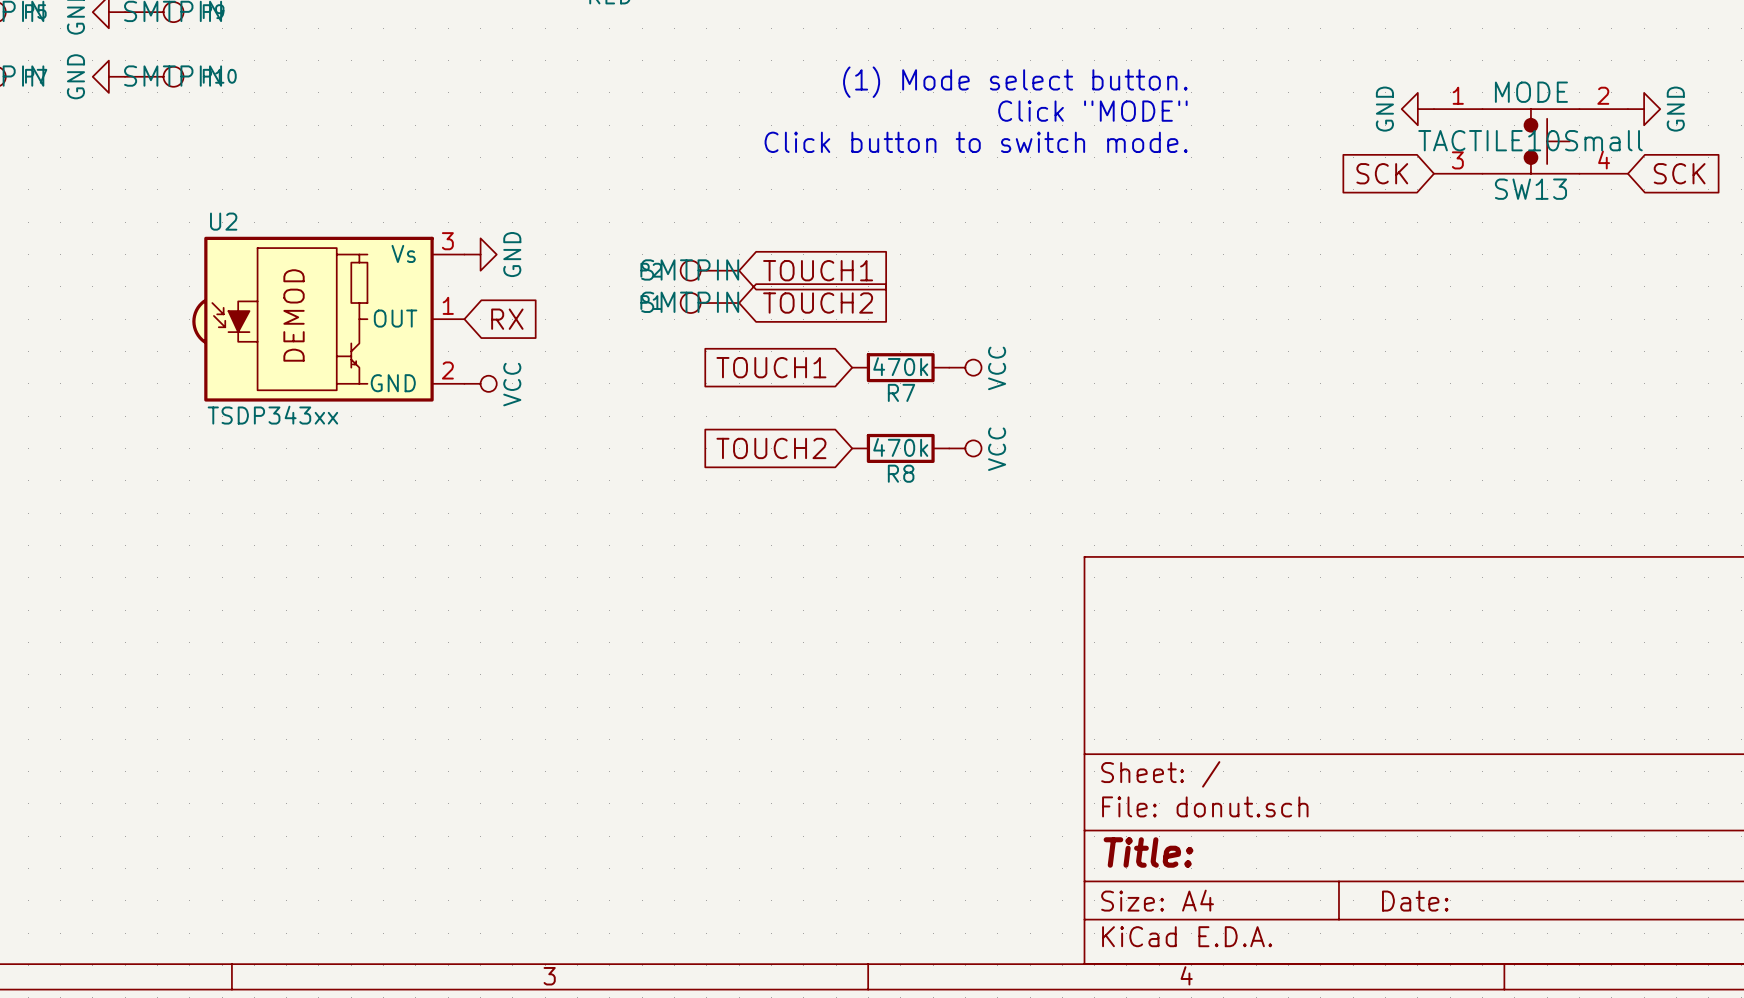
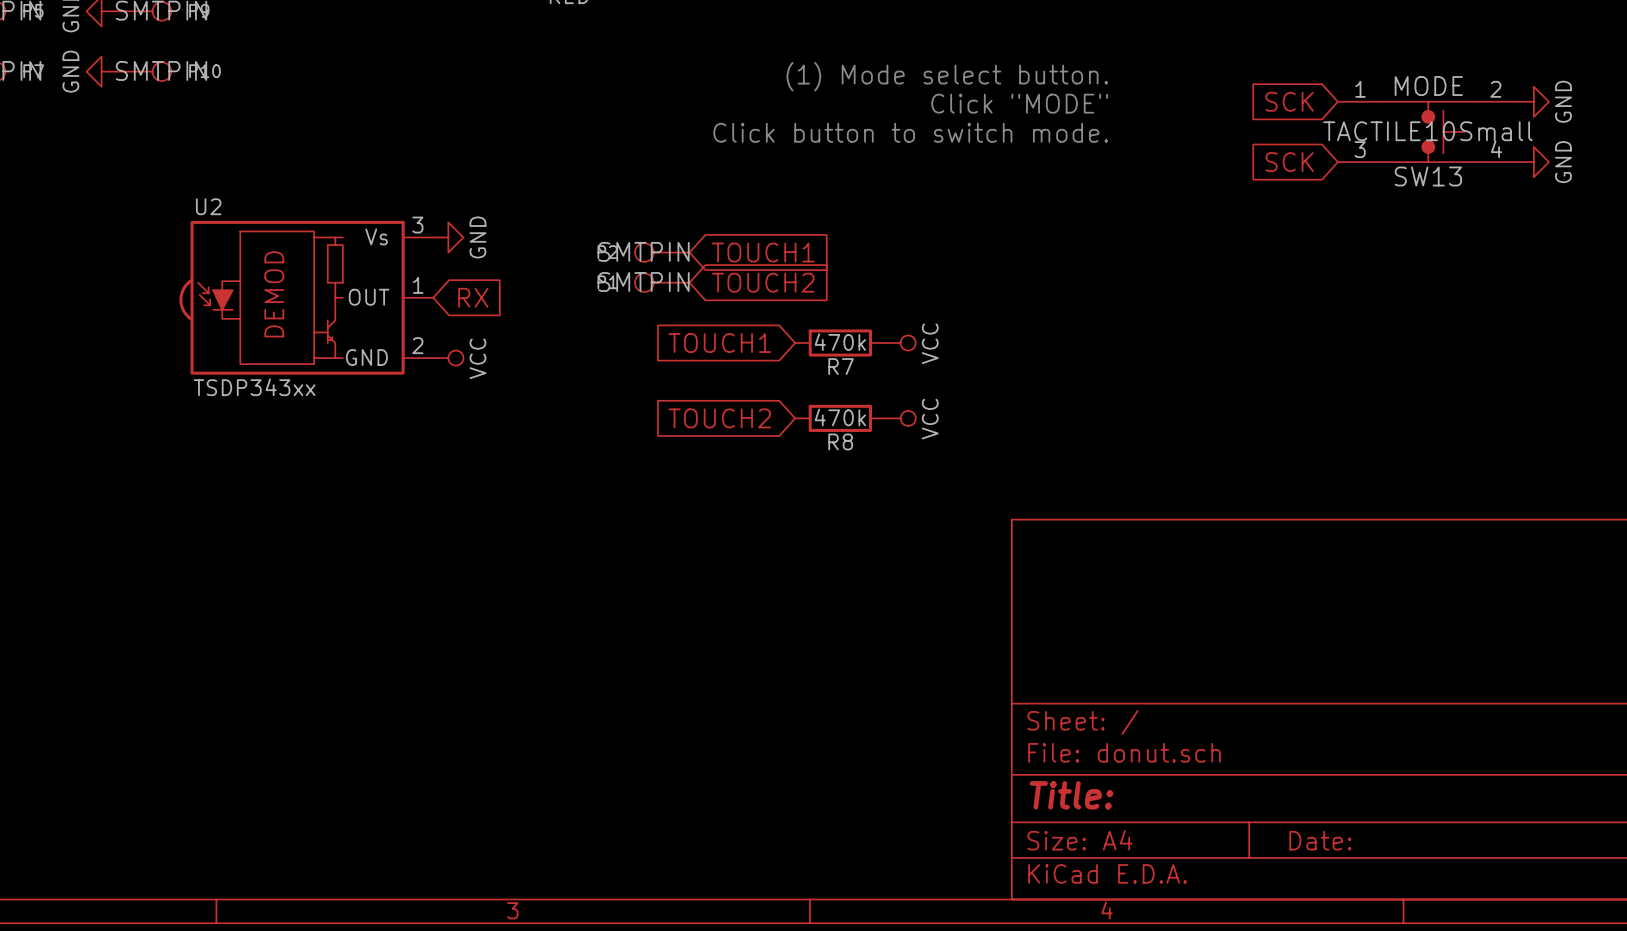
power symbol rotation: 0° (1417, 109) -> 180° (1533, 162)
power symbol position: GND (1417, 109) -> GND (1533, 162)
global label rotation: 0° (1679, 173) -> 180° (1289, 101)
global label position: SCK (1679, 173) -> SCK (1289, 101)

